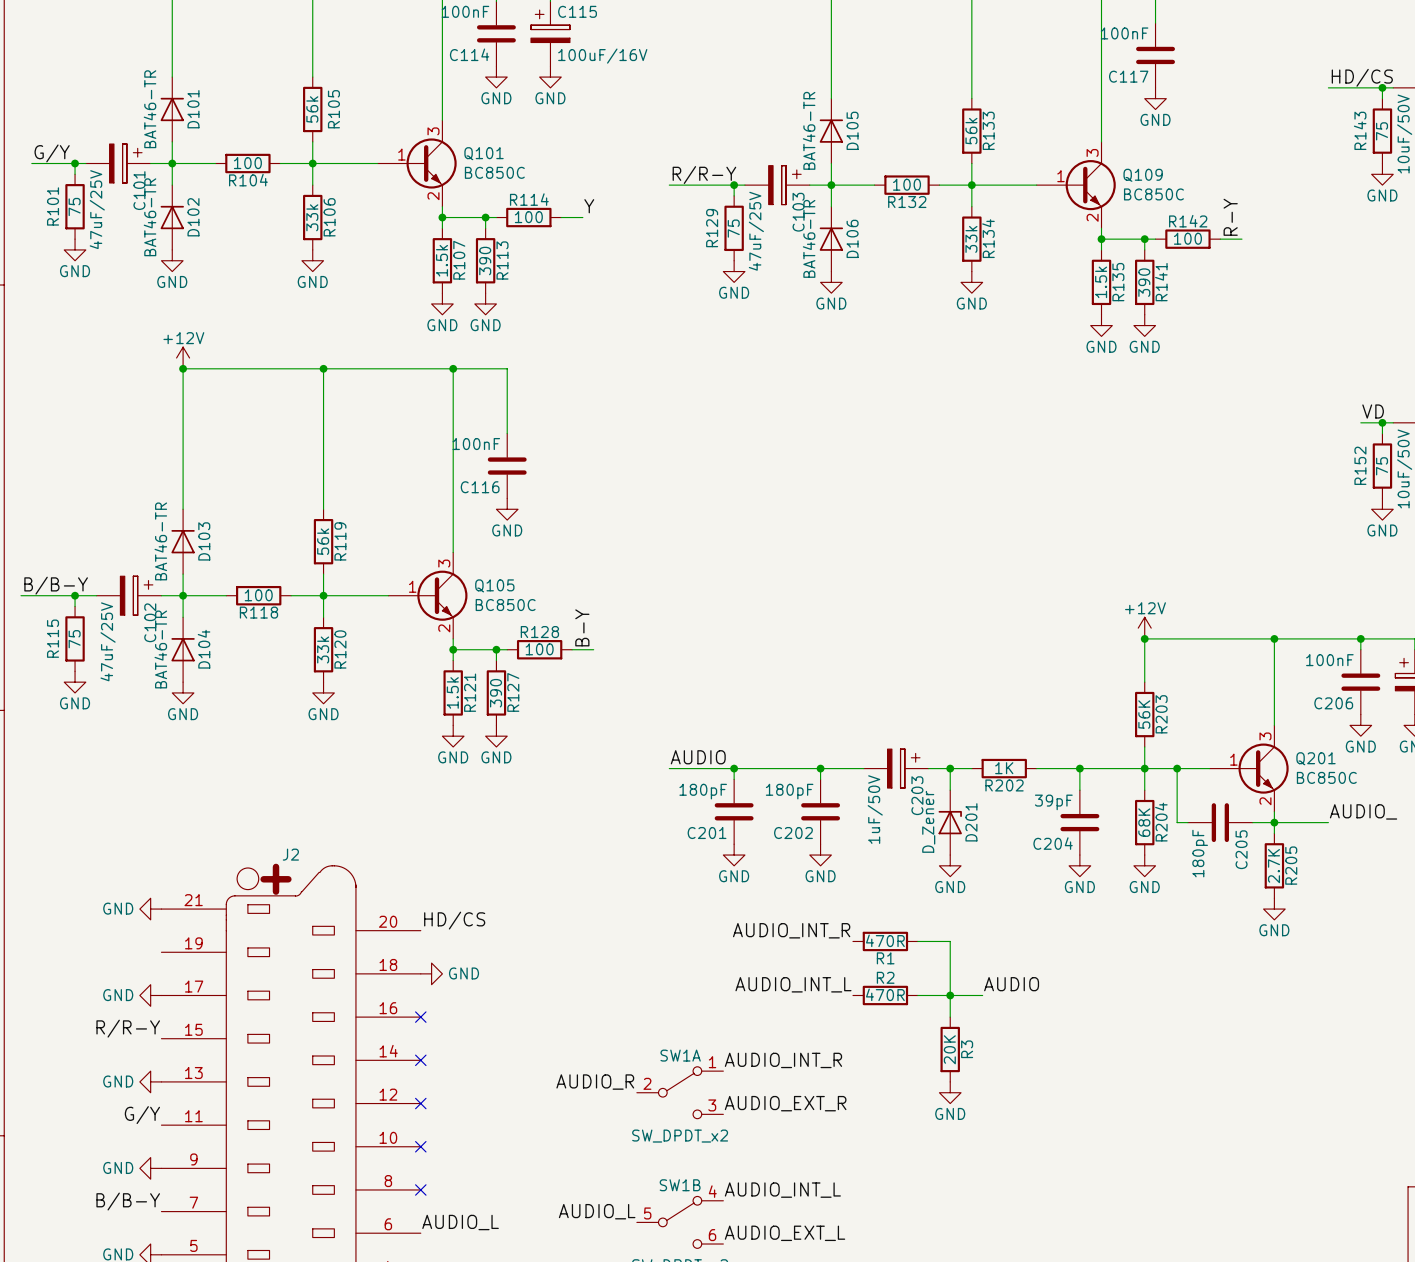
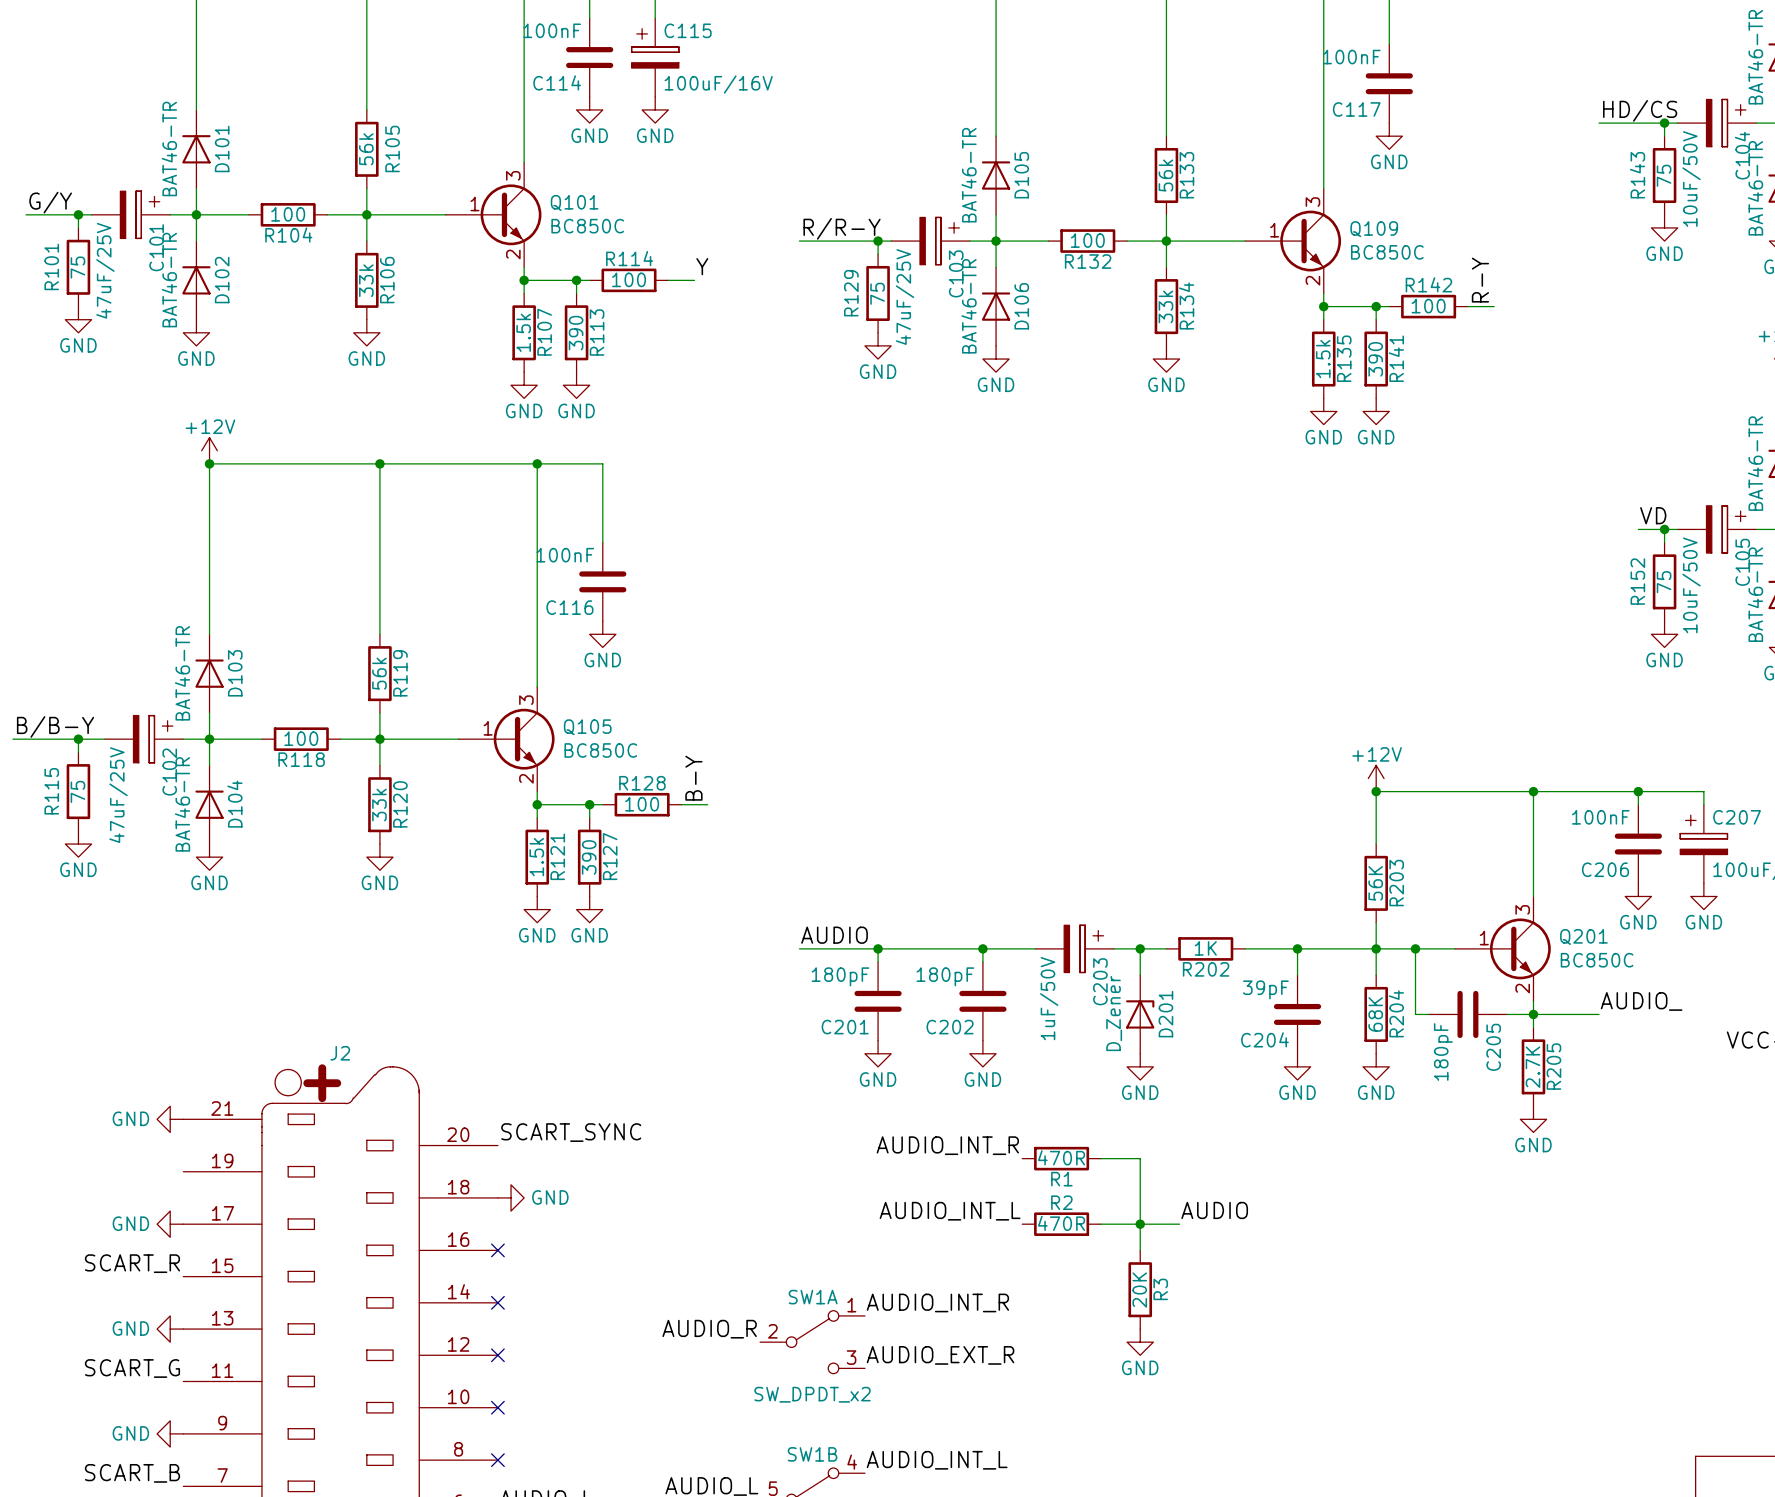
label: HD/CS (454, 920) -> SCART_SYNC (571, 1132)
label: R/R-Y (128, 1028) -> SCART_R (132, 1263)
label: G/Y (142, 1115) -> SCART_G (132, 1368)
label: B/B-Y (128, 1201) -> SCART_B (132, 1473)

